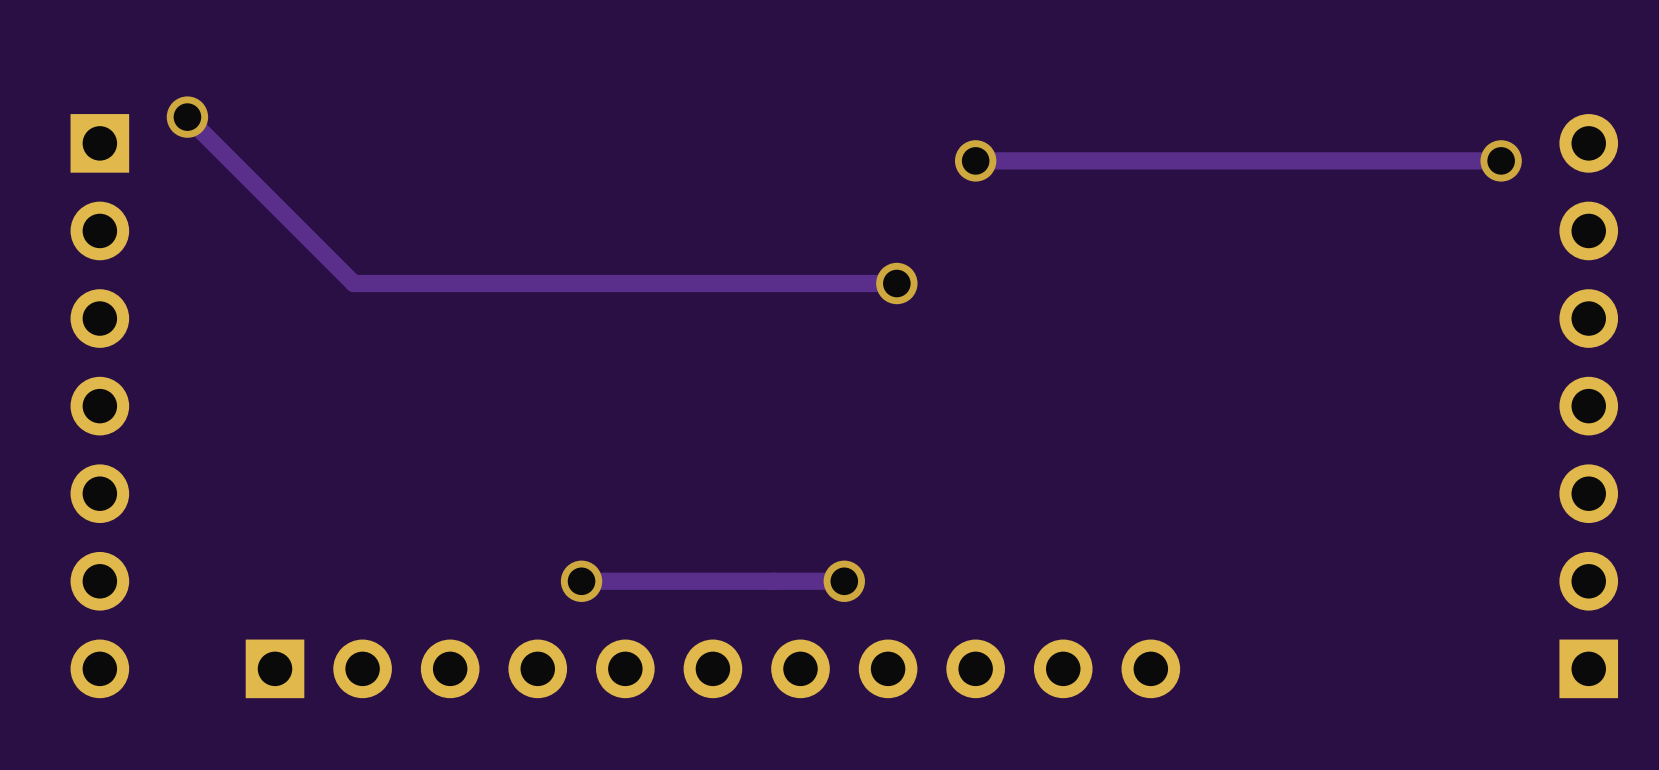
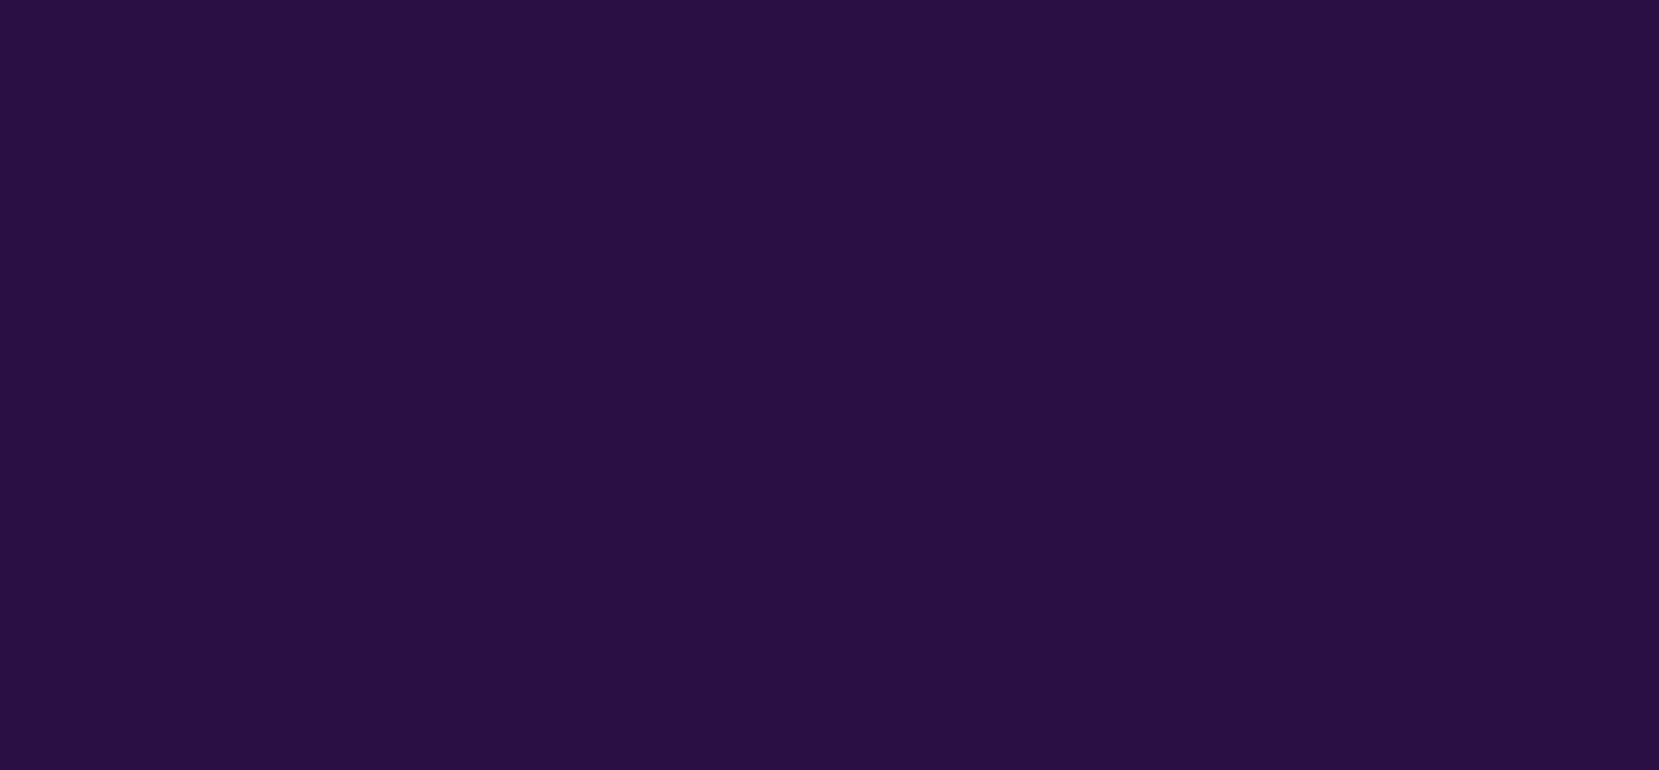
track: (187, 117) (353, 283) (896, 283) -> none
via: (187, 117) -> none
via: (975, 160) -> none
track: (1501, 160) (975, 160) -> none
via: (1501, 160) -> none
via: (896, 283) -> none
part: (99, 406) -> none
part: (1588, 406) -> none
via: (581, 581) -> none
track: (844, 581) (581, 581) -> none
via: (844, 581) -> none
part: (712, 668) -> none

